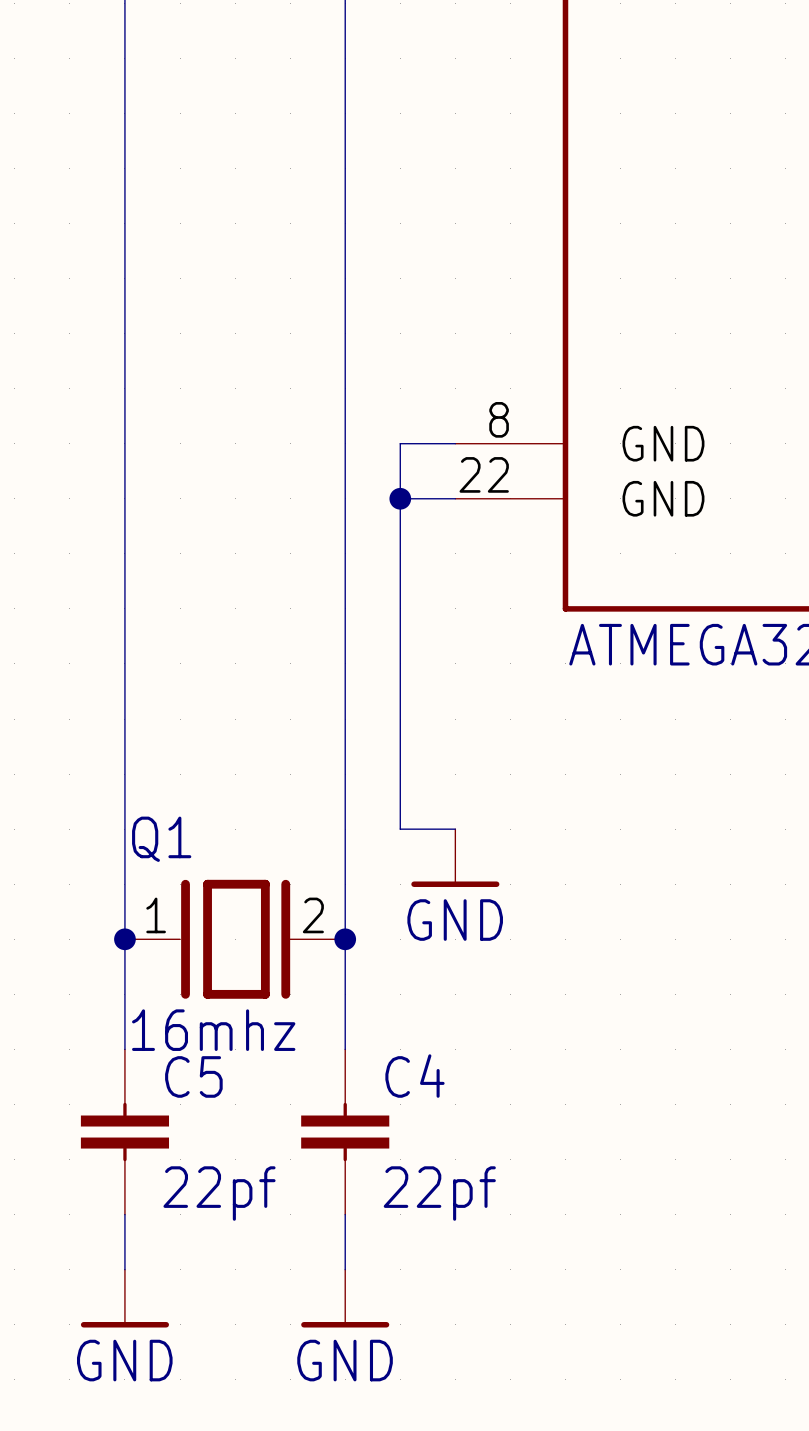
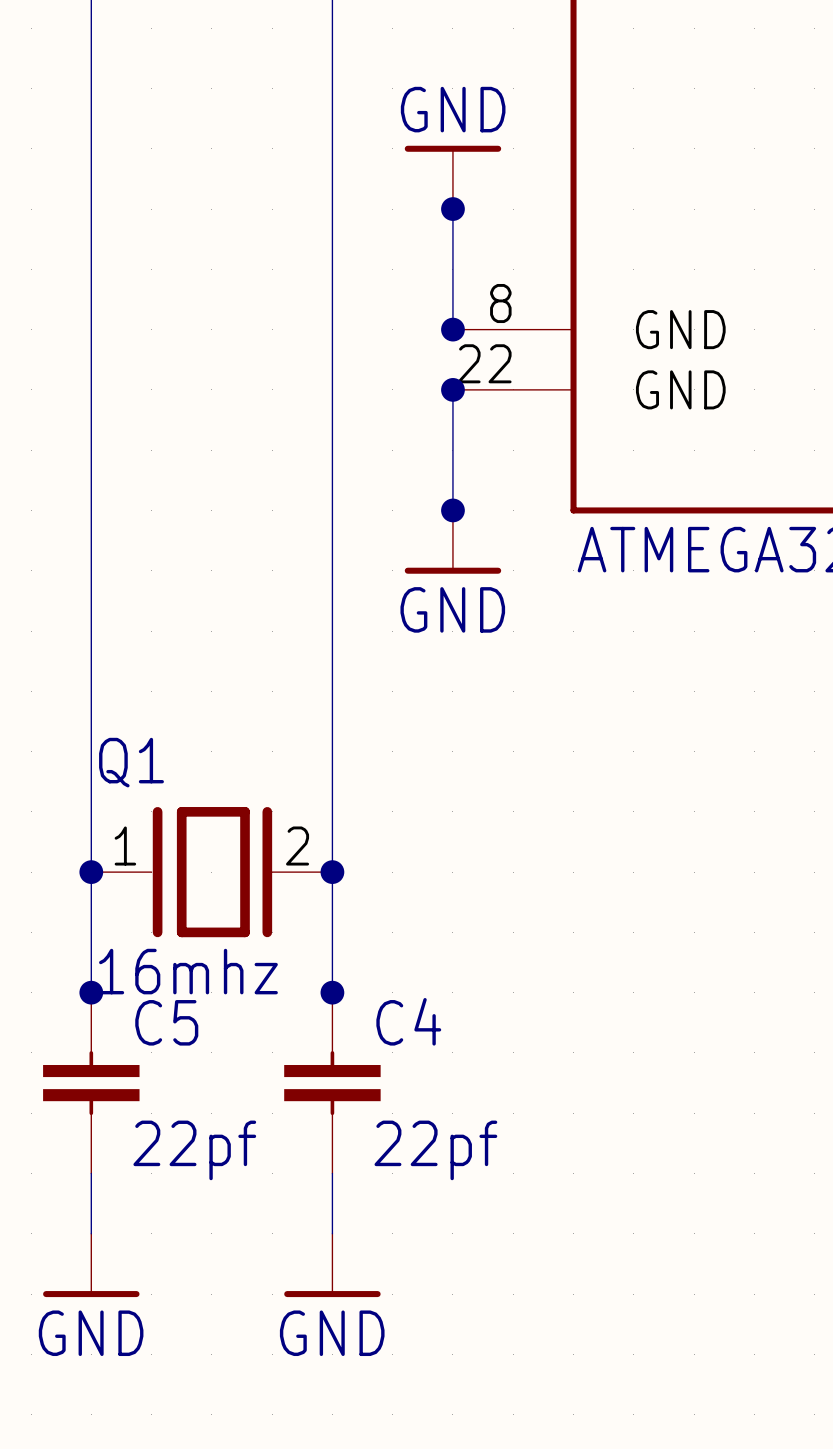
power symbol: none -> GND (452, 177)
junction: none -> (452, 209)
wire: (455, 443) (400, 443) (400, 829) (455, 829) -> (452, 329) (452, 209)
junction: none -> (452, 329)
wire: (400, 498) (455, 498) -> (452, 510) (452, 389)
junction: (400, 498) -> none
junction: none -> (452, 389)
junction: none -> (452, 510)
power symbol position: GND (455, 858) -> GND (452, 542)
junction: none -> (91, 992)
junction: none -> (332, 992)

